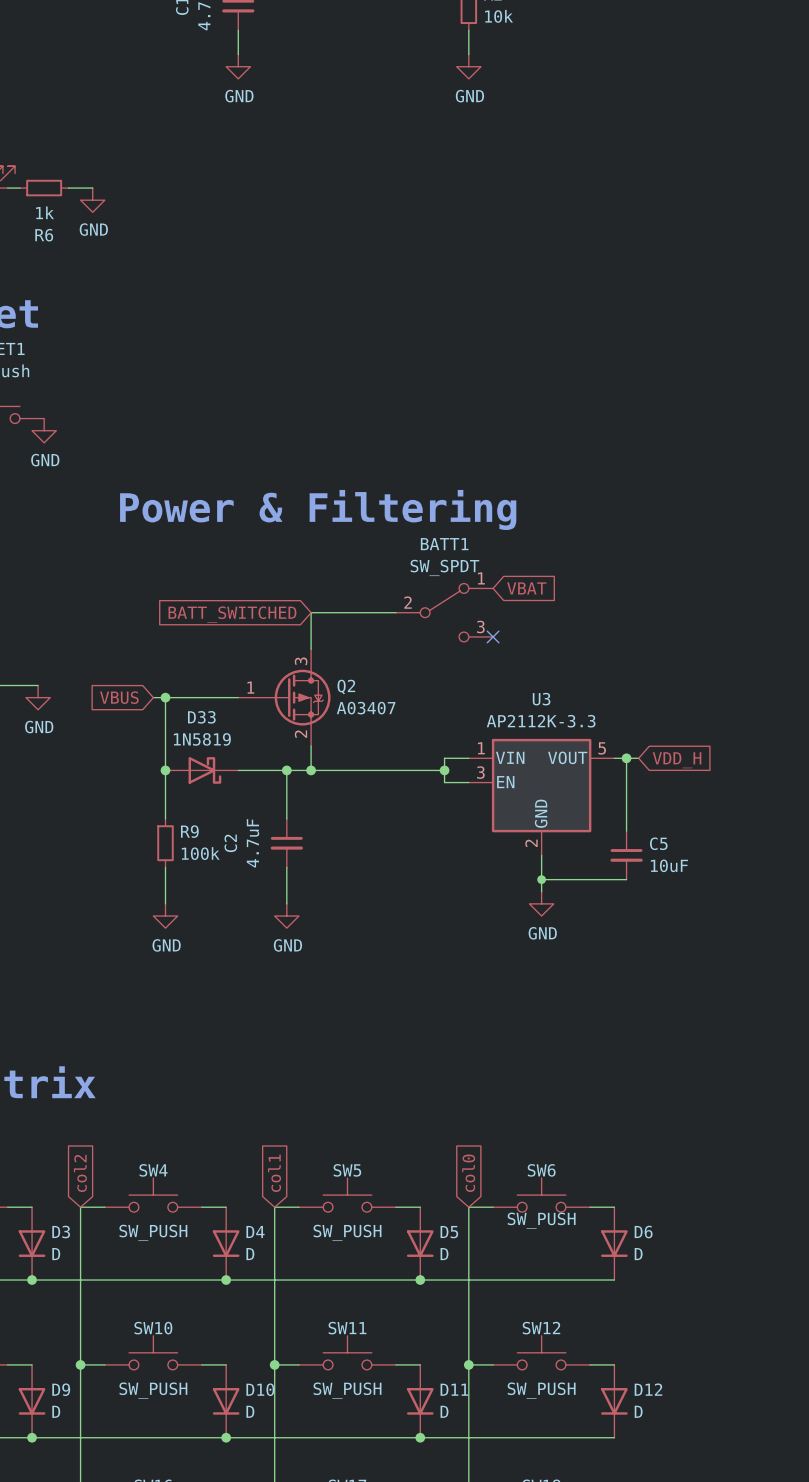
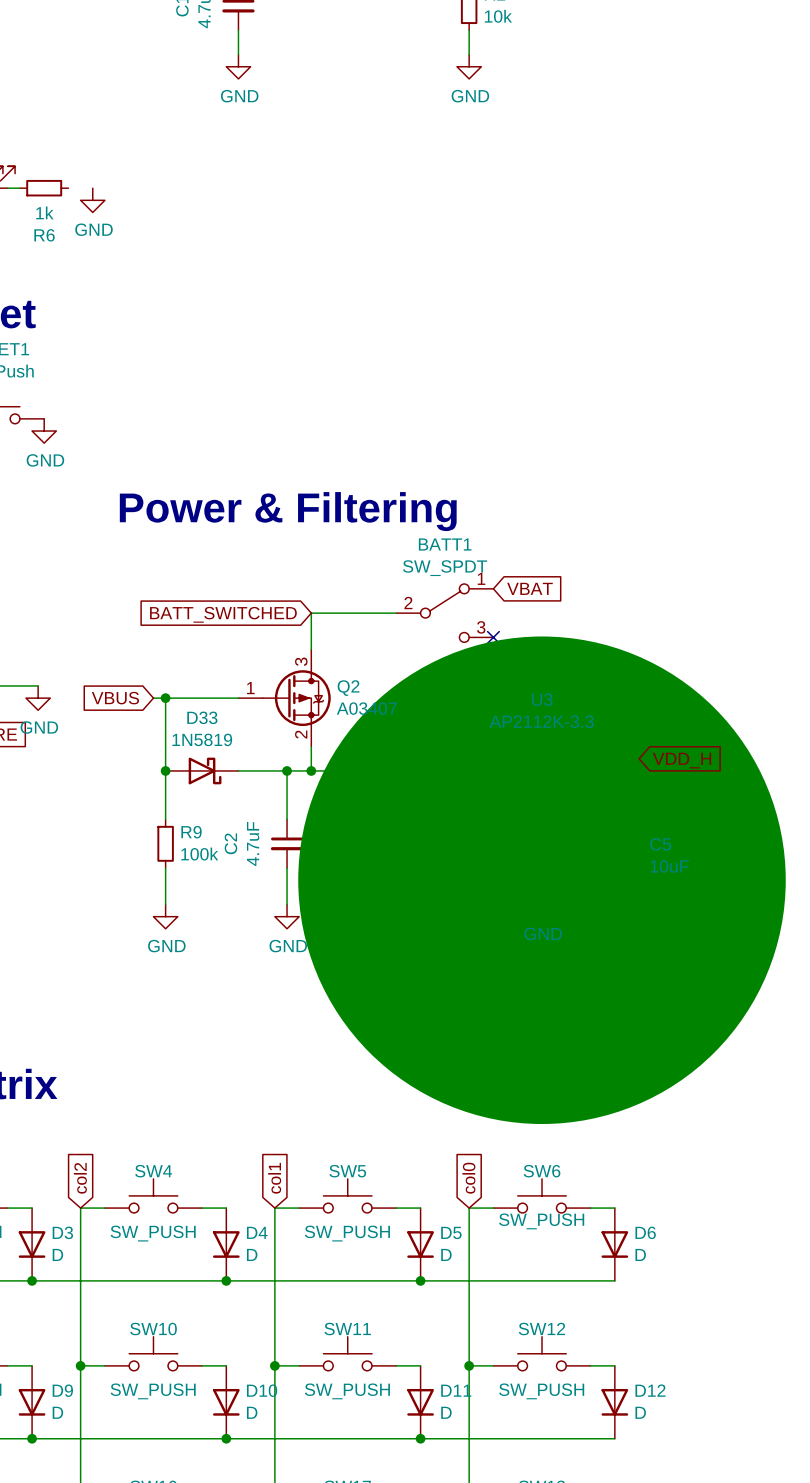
wire: (68, 188) (92, 188) -> none
junction size: [537, 875, 546, 884] -> [298, 636, 786, 1125]

